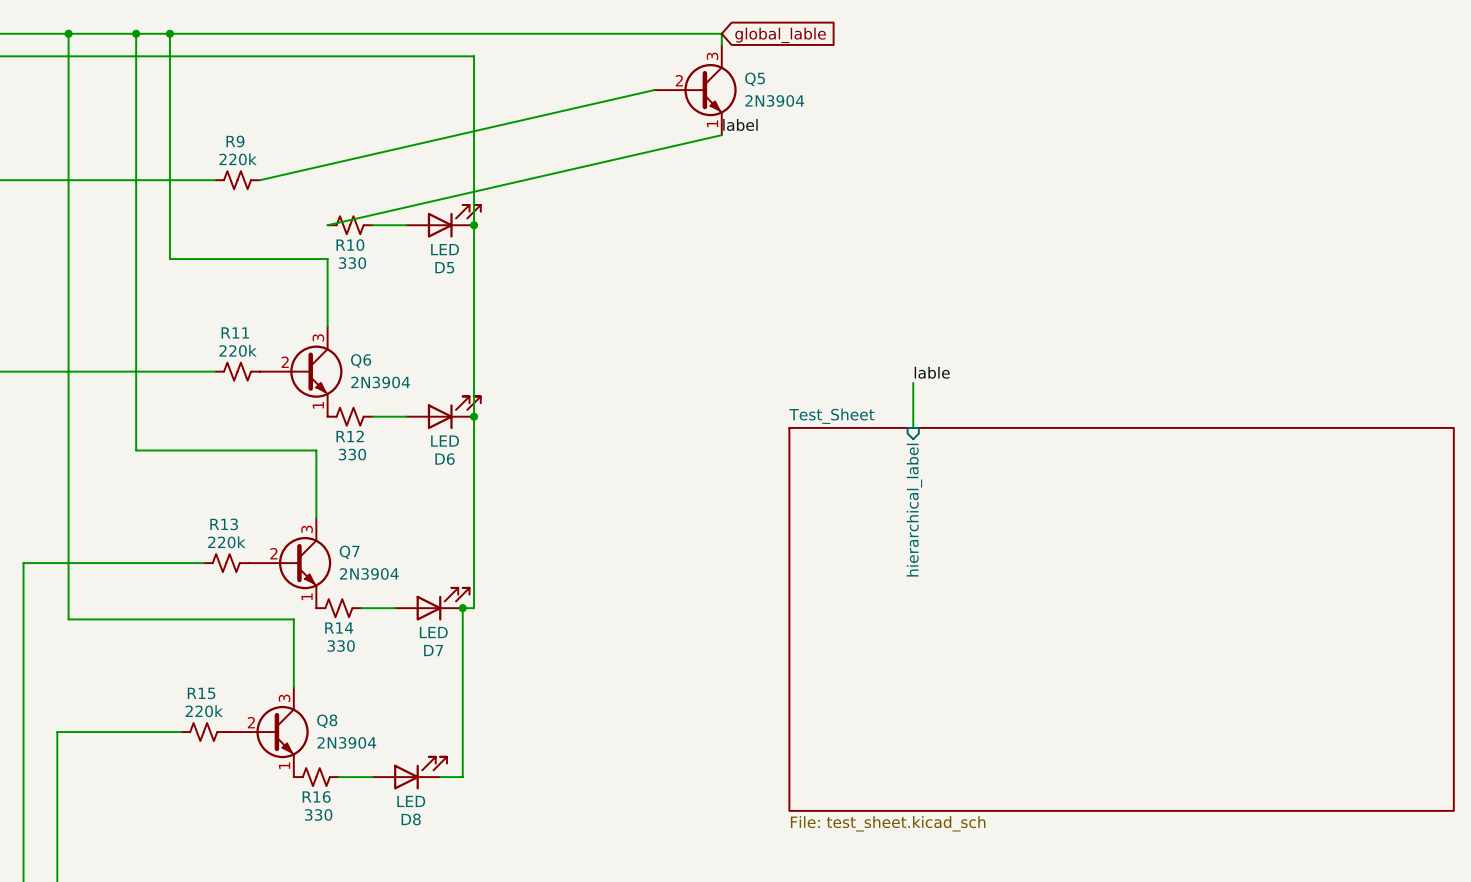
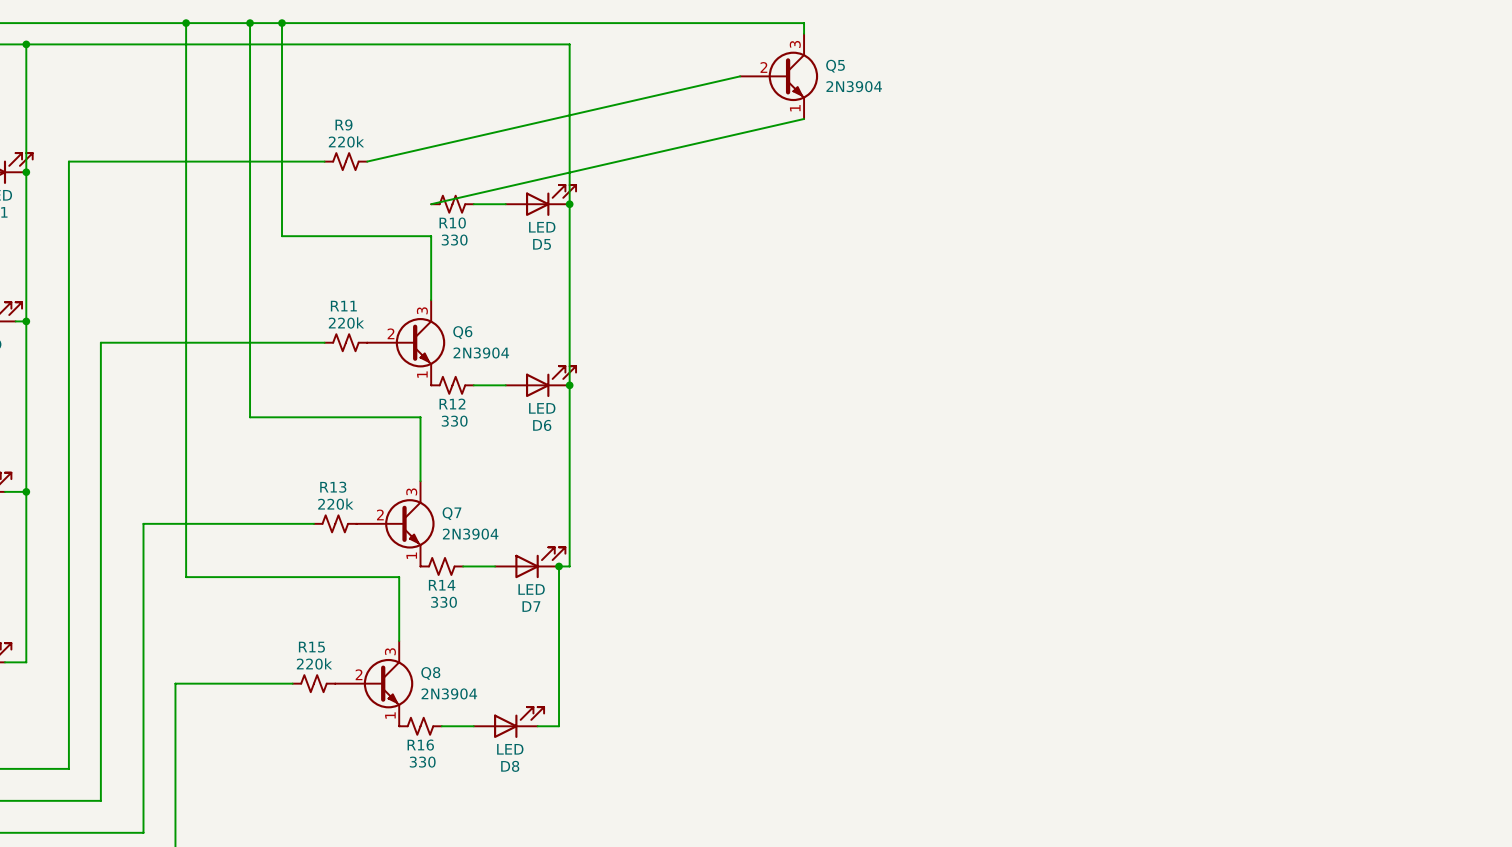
global label: global_lable (780, 35) -> none
label: label (740, 124) -> none
label: lable (932, 372) -> none
wire: (913, 382) (913, 427) -> none
sheet pin: hierarchical_label (914, 510) -> none
sheet Test_Sheet: File: test_sheet.kicad_sch (1121, 619) -> none

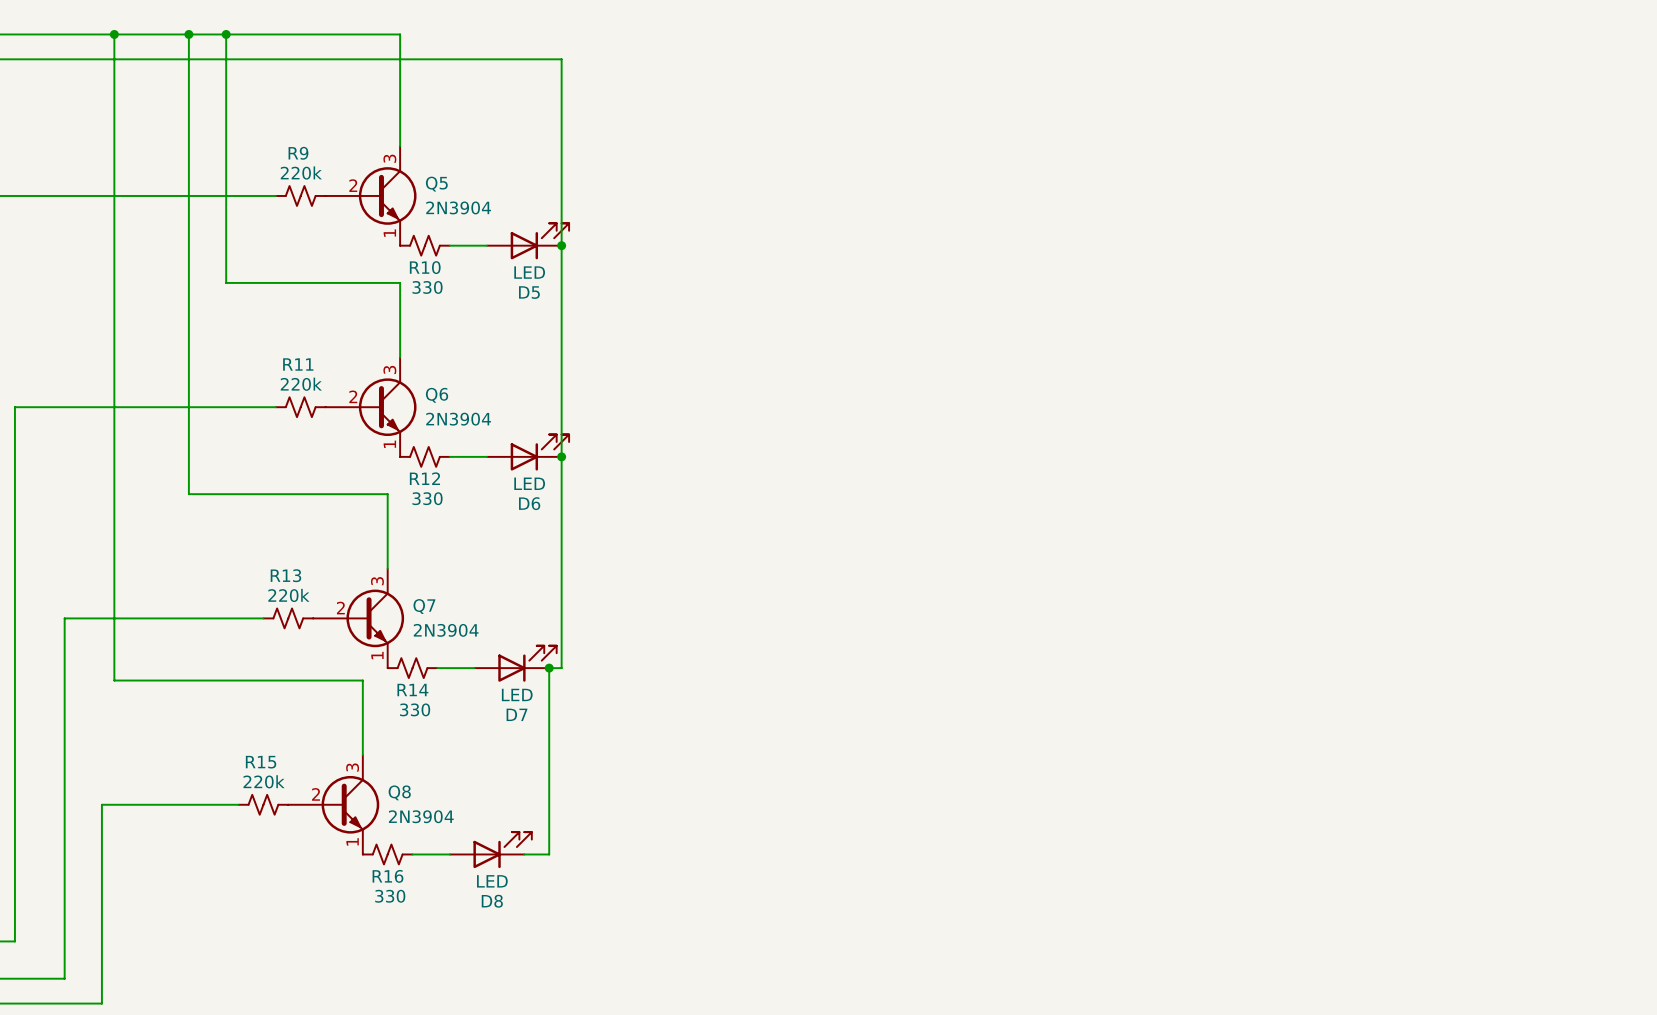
wire: (431, 23) (804, 23) (804, 33) -> (400, 34) (400, 146)
wire: (740, 76) (367, 161) -> none
Q5 position: (779, 76) -> (371, 195)
wire: (804, 118) (431, 204) -> none

